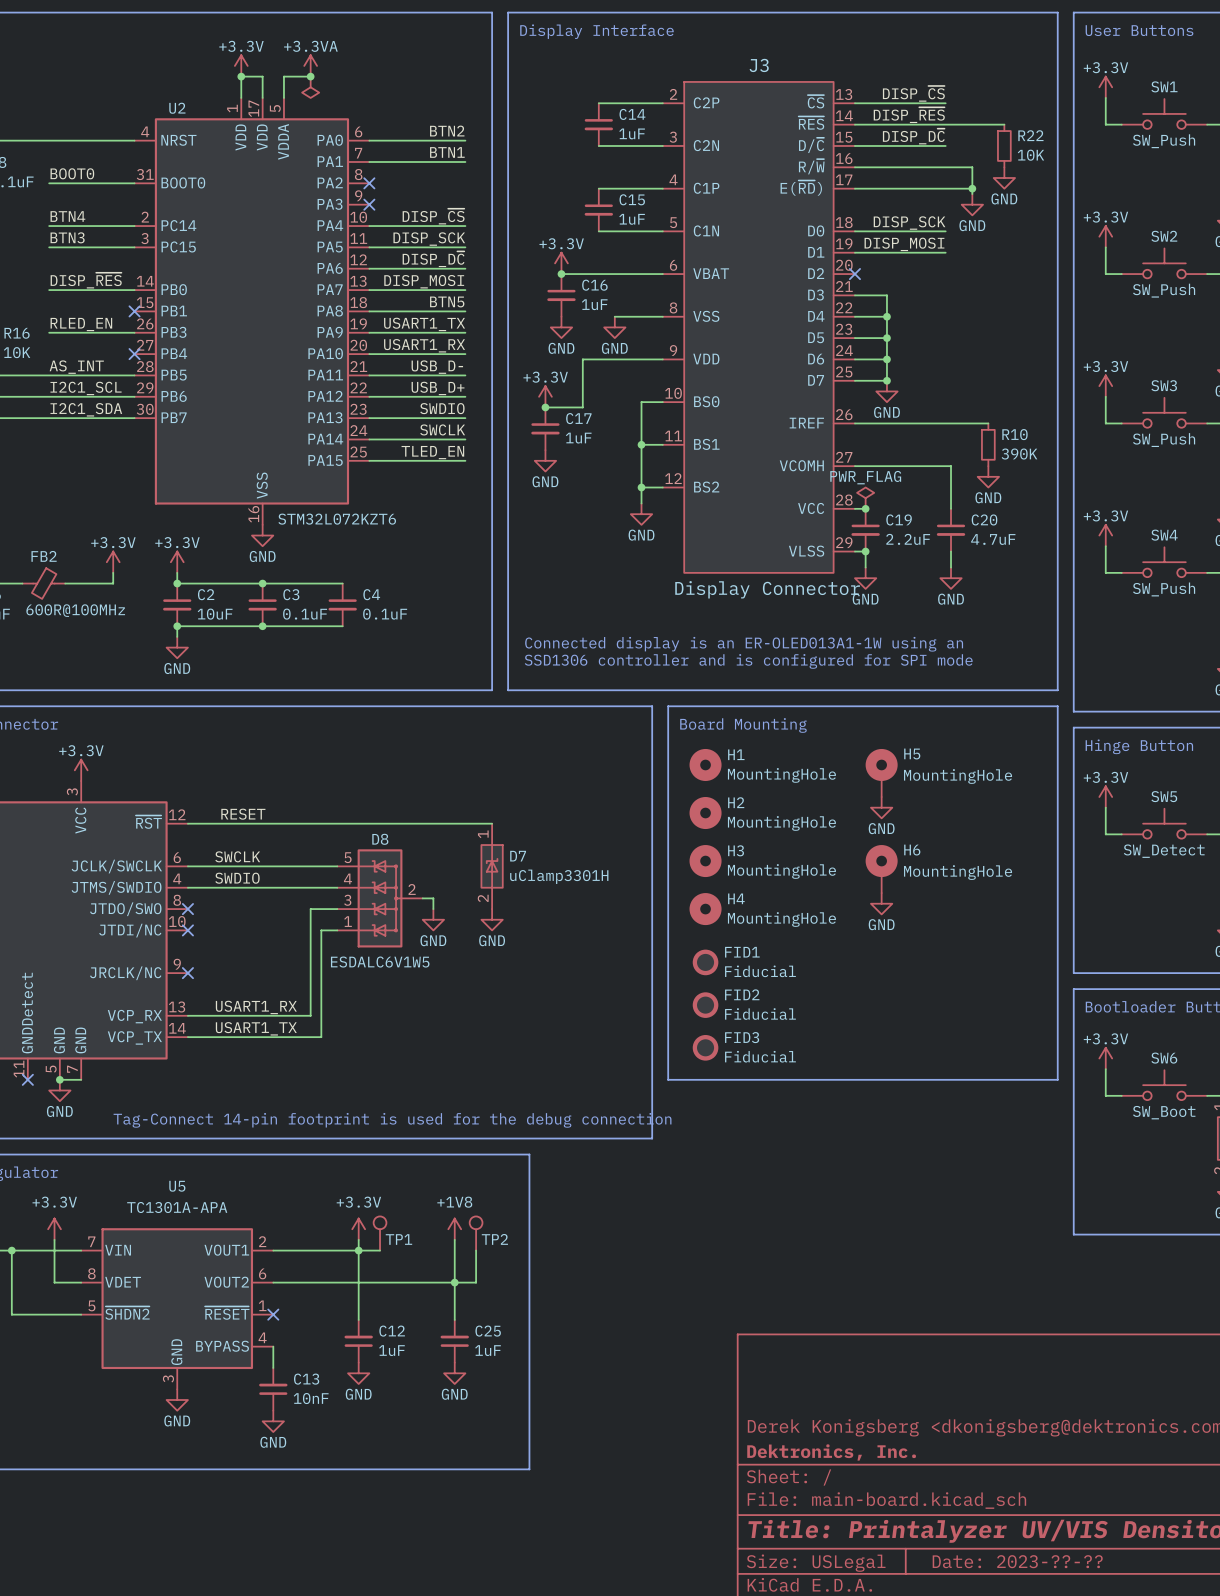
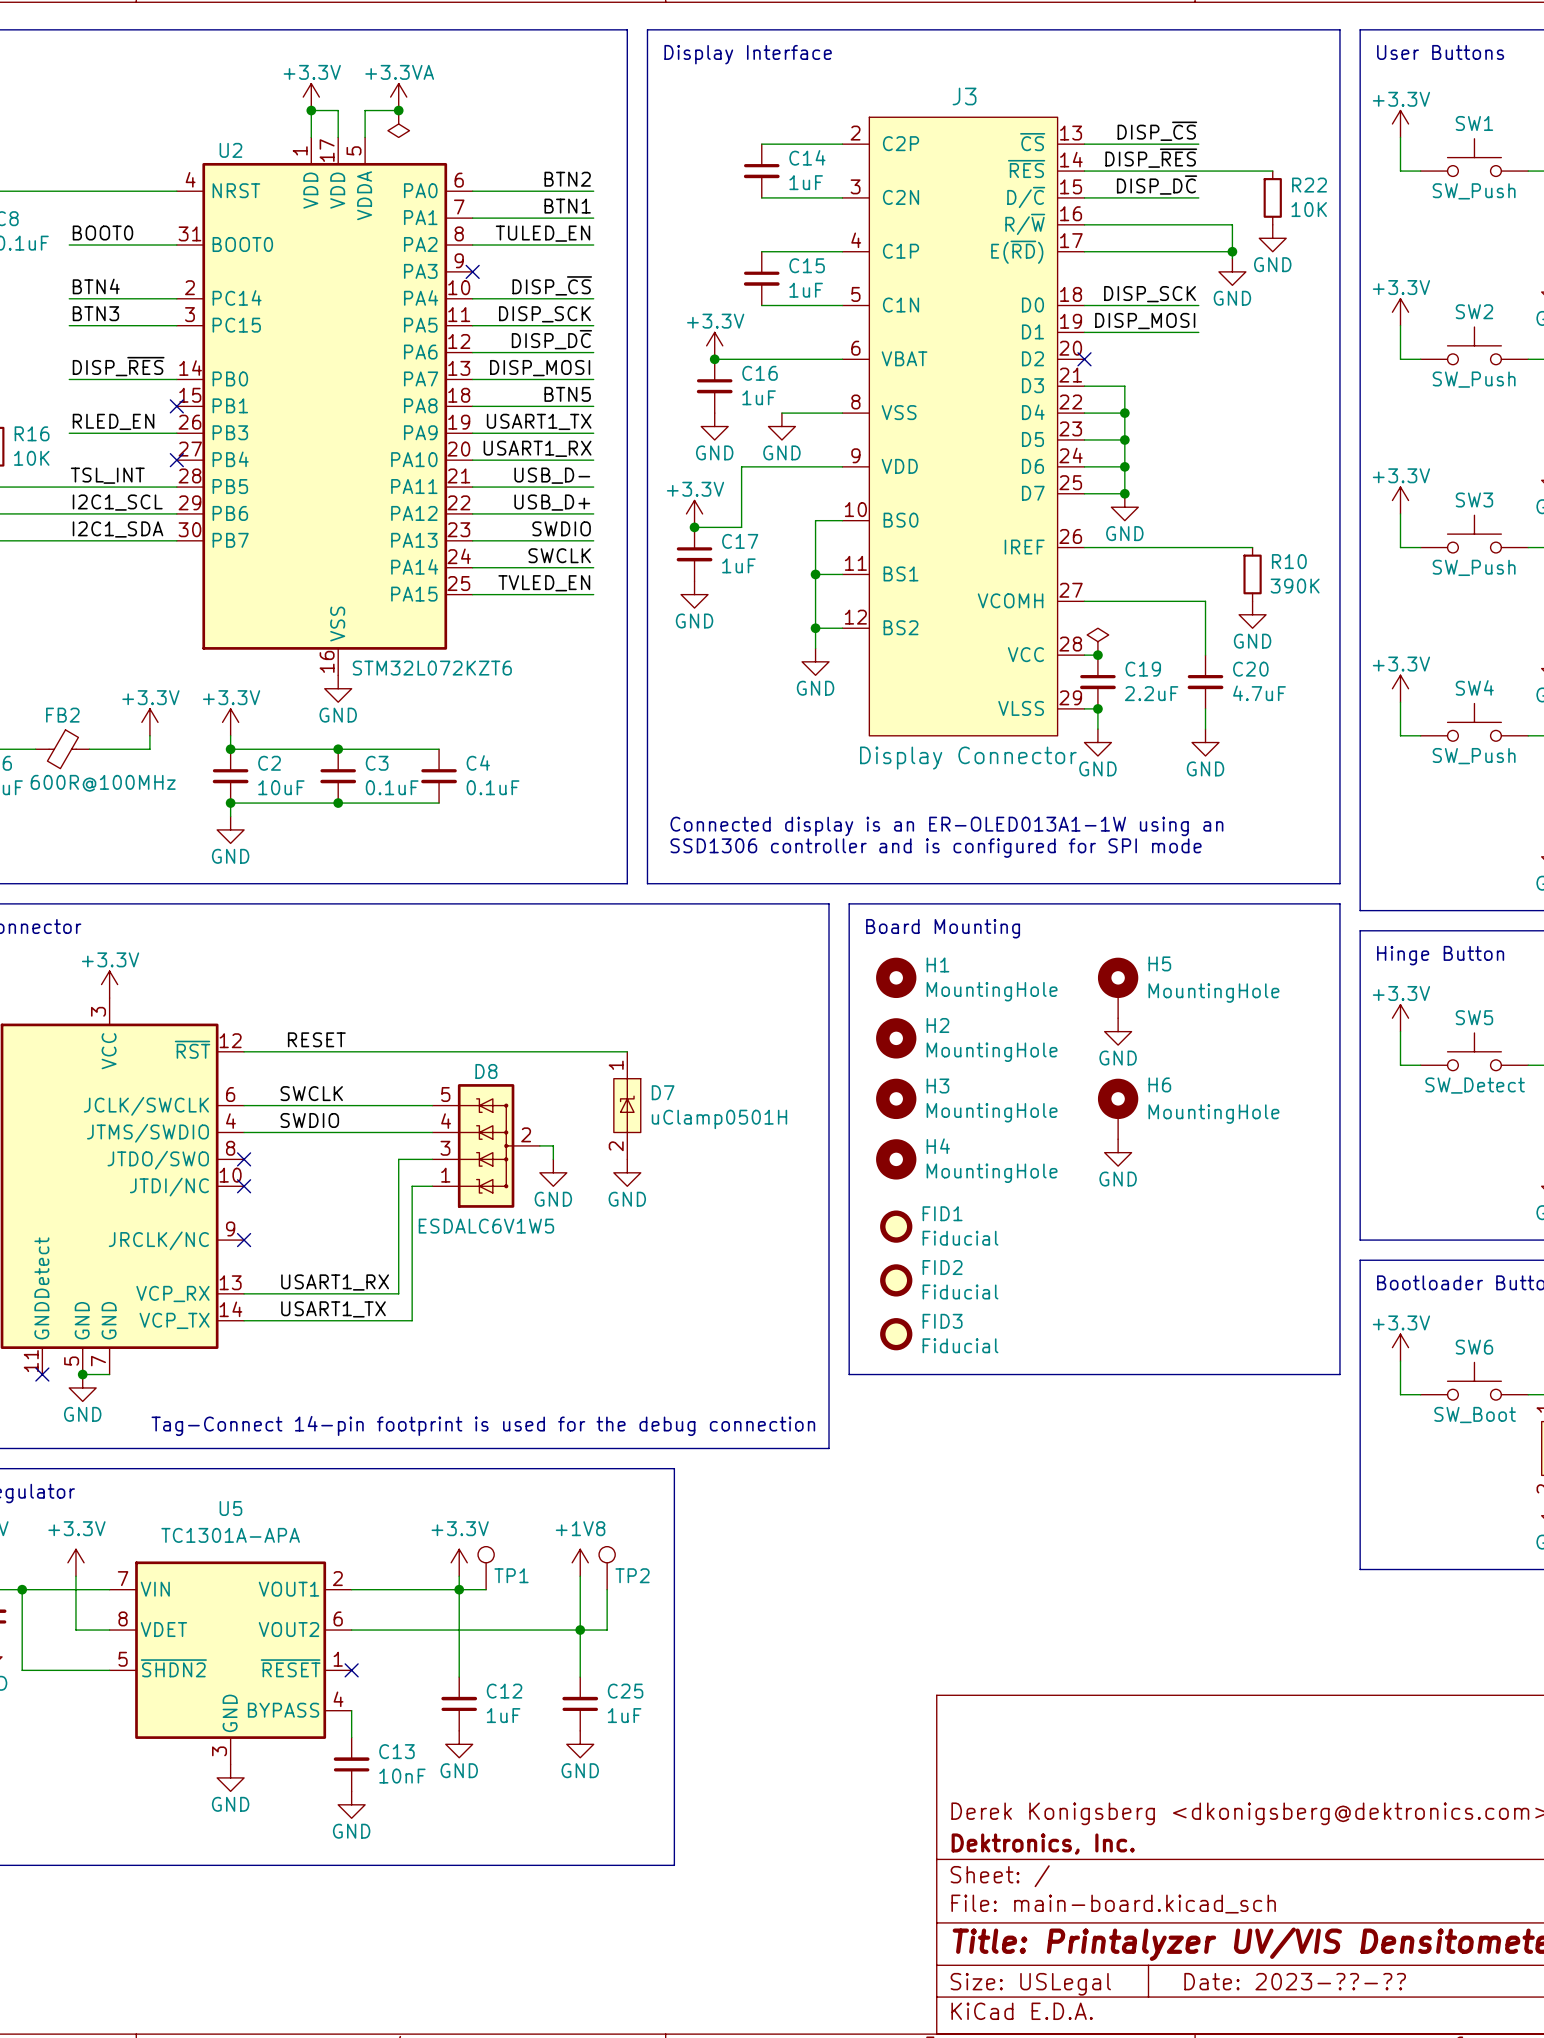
label: none -> TULED_EN (543, 233)
wire: none -> (472, 245) (593, 245)
no-connect mark: (369, 183) -> none
label: AS_INT (76, 367) -> TSL_INT (107, 475)
label: TLED_EN (432, 452) -> TVLED_EN (544, 583)
power symbol text: PWR_FLAG (865, 477) -> none
D7 value: uClamp3301H (559, 876) -> uClamp0501H (719, 1119)

